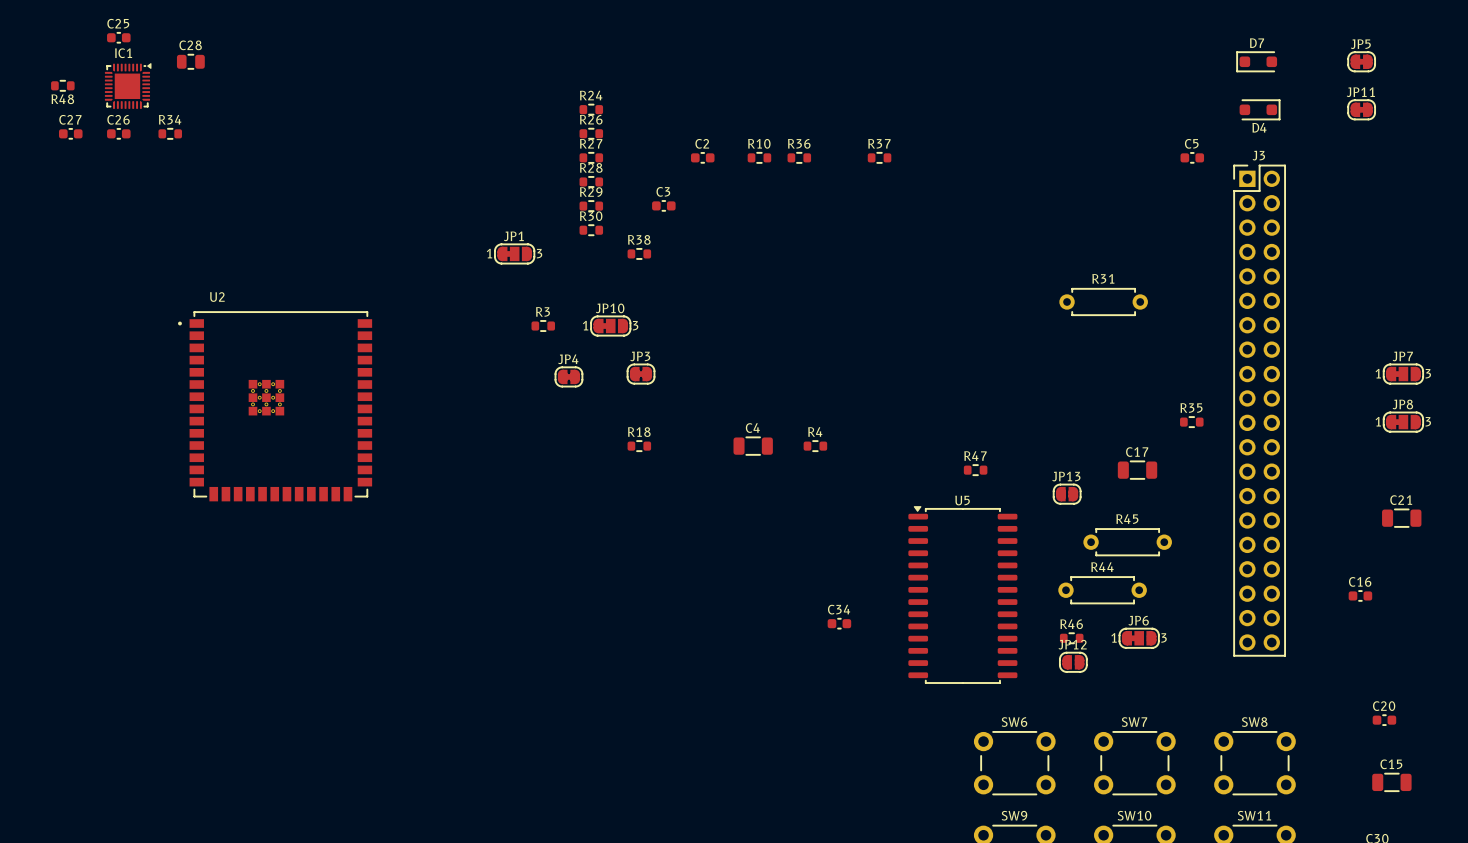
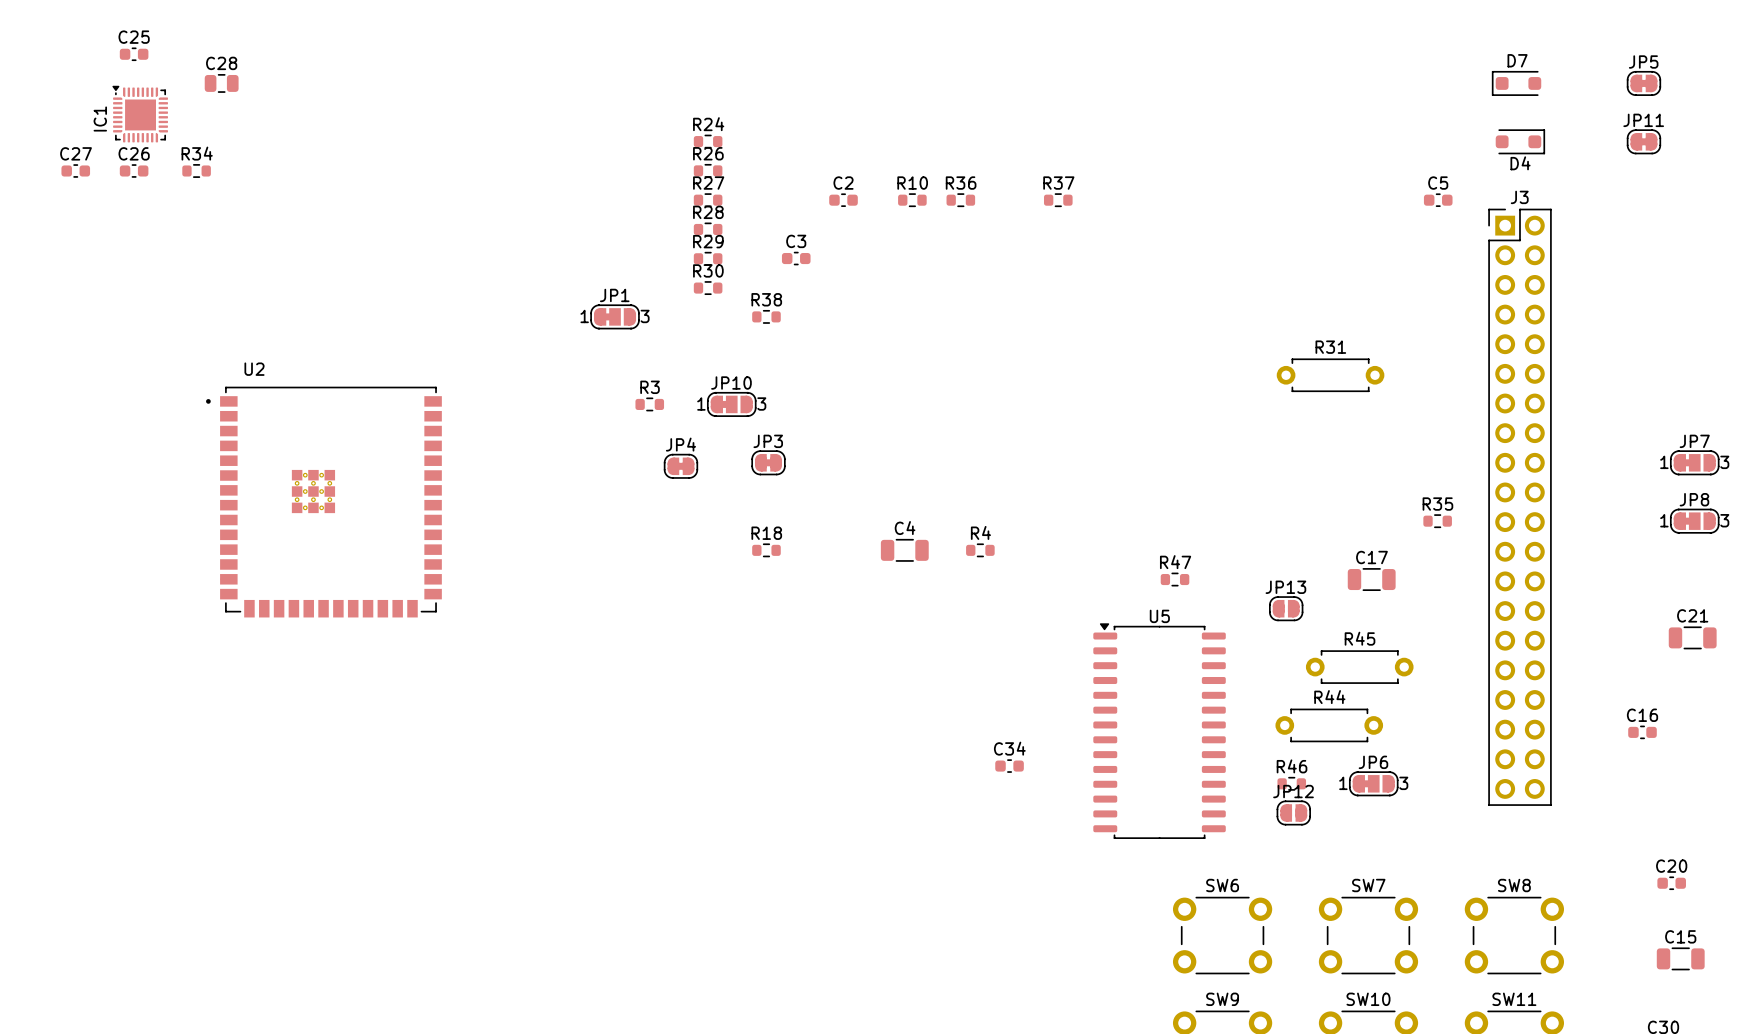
R48: (62, 85) -> none
IC1 rotation: 0° (128, 86) -> 90° counterclockwise (140, 114)

